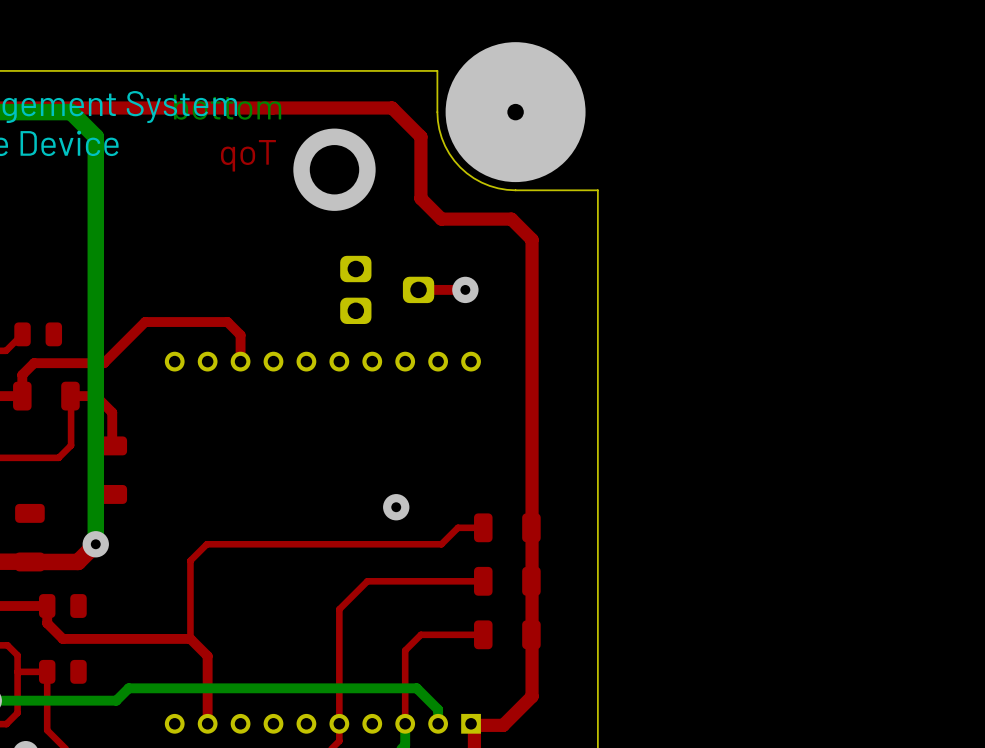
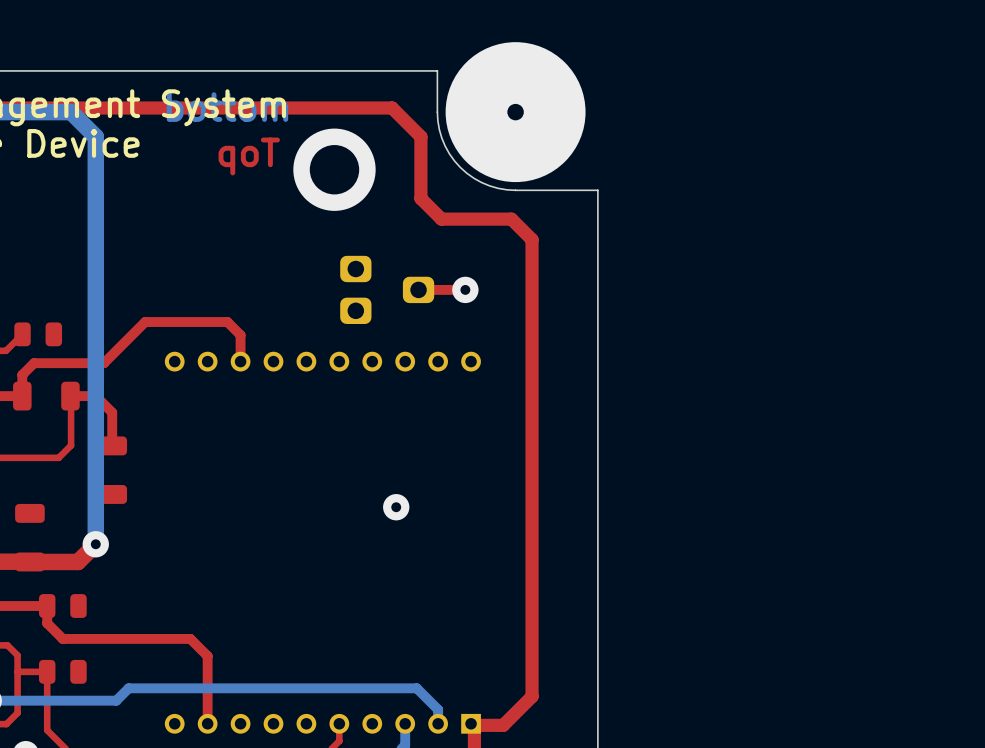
top track: (483, 527) (457, 527) (441, 544) (206, 544) (190, 560) (190, 638) -> none
part: (507, 527) -> none
top track: (483, 581) (367, 581) (339, 609) (339, 723) -> none
part: (507, 581) -> none
top track: (483, 634) (420, 634) (405, 650) (405, 723) -> none
part: (507, 634) -> none

